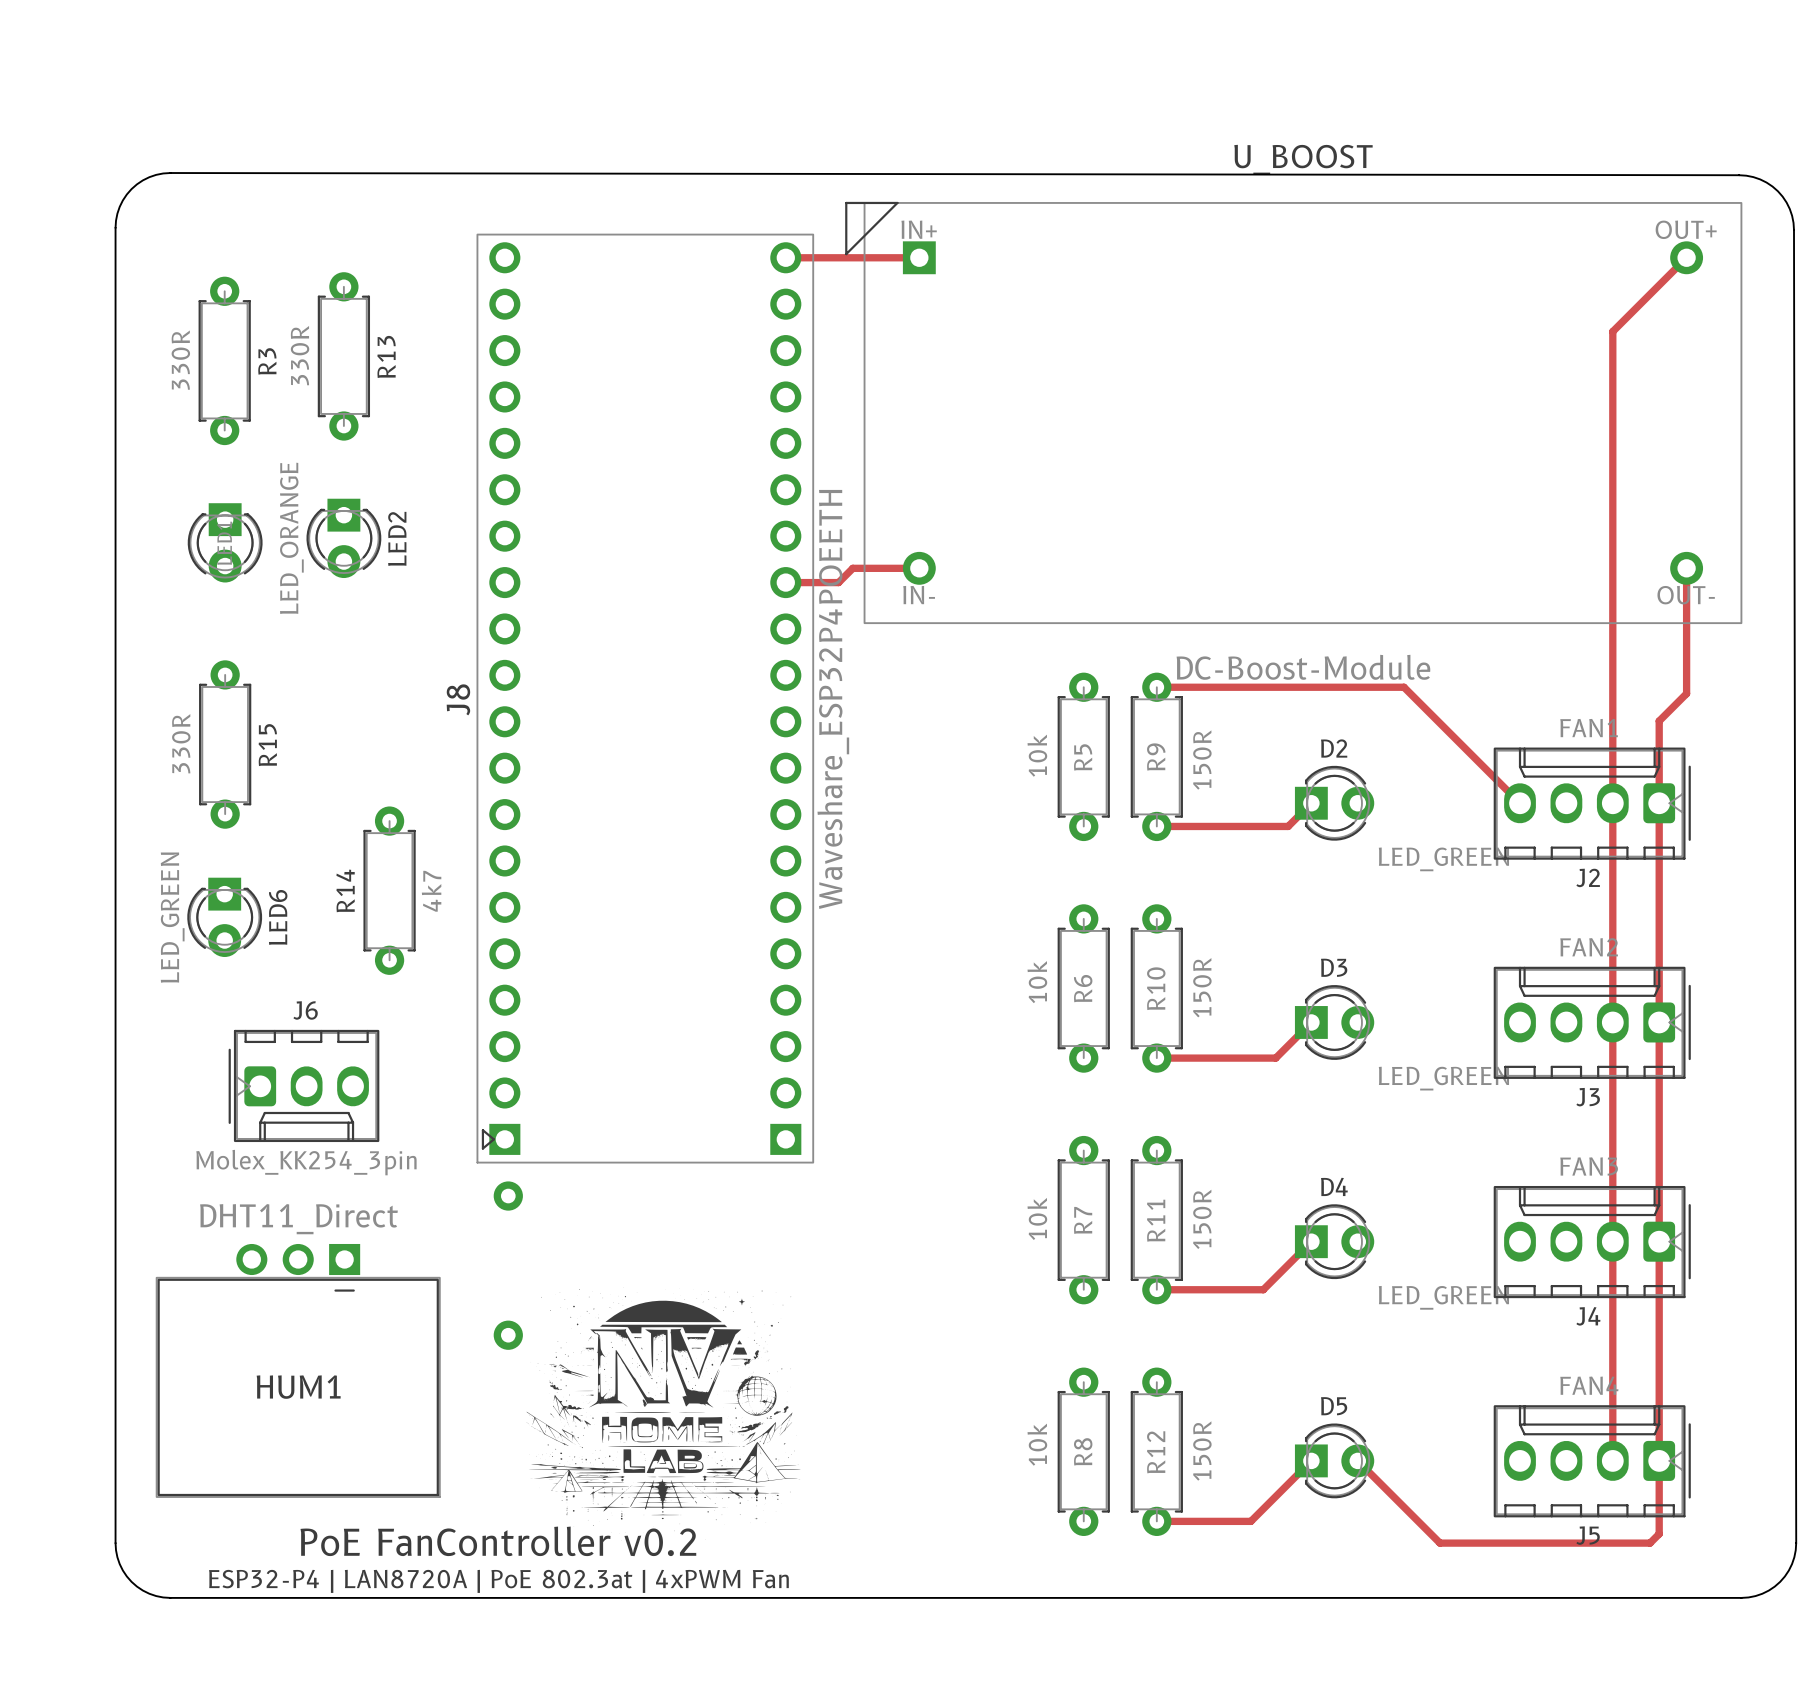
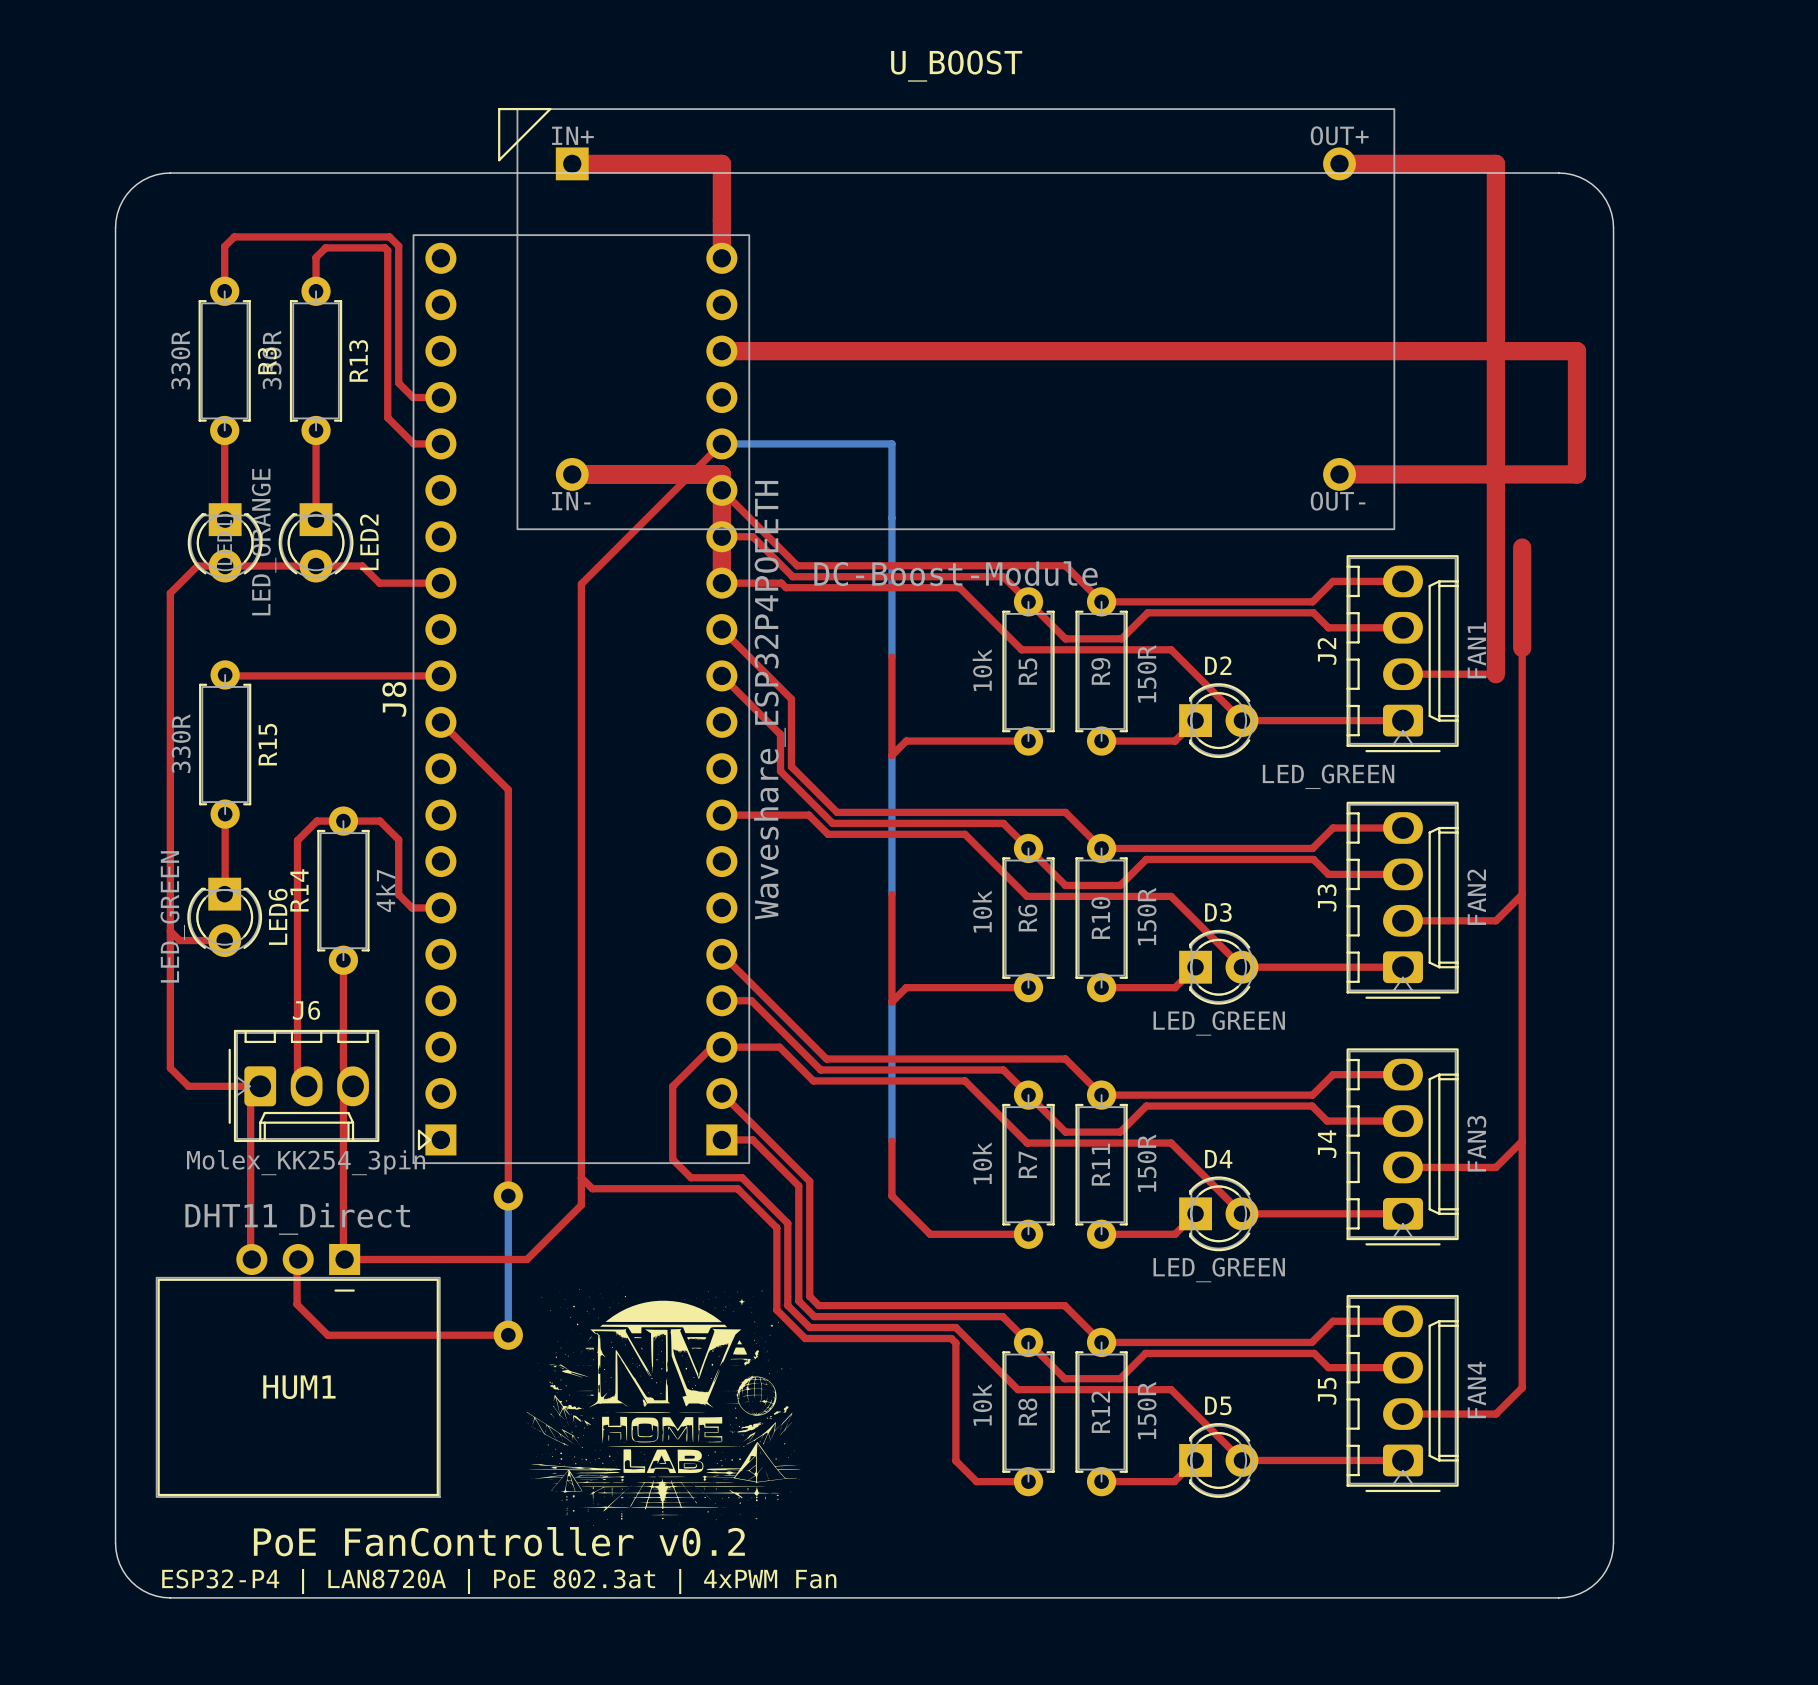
top track: none -> (572, 163) (721, 163) (721, 258)
top track: none -> (1339, 163) (1495, 163) (1495, 674) (1402, 674)
board edge: (170, 173) (1739, 175) (1760, 179) (1777, 191) (1789, 209) (1794, 230) (1795, 1550) (1792, 1564) (1784, 1576) (1774, 1586) (1755, 1596) (1741, 1597) (1558, 1597) -> (170, 173) (1558, 173) (1579, 177) (1597, 189) (1609, 206) (1613, 227) (1613, 1543) (1609, 1564) (1597, 1581) (1579, 1593) (1558, 1597)
top track: (785, 257) (919, 257) -> none
top track: (1686, 257) (1612, 331) (1612, 1460) -> none
top track: none -> (224, 291) (224, 246) (234, 236) (389, 236) (398, 246) (398, 383) (413, 397) (440, 397)
top track: none -> (316, 291) (316, 257) (325, 247) (385, 247) (387, 250) (387, 417) (413, 443) (440, 443)
top track: none -> (721, 351) (1577, 351) (1577, 474) (1339, 474)
R13 position: (343, 356) -> (316, 360)
U_BOOST position: (1293, 412) -> (946, 319)
top track: none -> (224, 430) (224, 519)
top track: none -> (316, 430) (316, 519)
top track: none -> (721, 443) (581, 584) (581, 1205) (527, 1259) (343, 1259) (343, 1086)
bottom track: none -> (721, 443) (891, 443) (891, 657)
top track: none -> (572, 474) (721, 474) (721, 583) (781, 583) (785, 587) (959, 587) (1021, 649) (1171, 649) (1241, 720) (1402, 720)
top track: none -> (721, 490) (797, 565) (1065, 565) (1101, 601) (1312, 601) (1333, 581) (1402, 581)
top track: none -> (721, 536) (752, 536) (792, 576) (1003, 576) (1065, 638) (1121, 638) (1147, 612) (1313, 612) (1328, 627) (1402, 627)
LED2 position: (343, 538) -> (316, 542)
top track: none -> (1522, 547) (1522, 1387) (1495, 1414) (1402, 1414)
top track: (919, 568) (852, 568) (838, 582) (785, 582) -> none
top track: (1686, 568) (1686, 693) (1659, 721) (1659, 1533) (1650, 1543) (1439, 1543) (1357, 1460) -> none
top track: none -> (440, 583) (379, 583) (362, 566) (197, 566) (170, 593) (170, 1068) (188, 1086) (251, 1086)
top track: none -> (721, 629) (791, 699) (791, 766) (837, 812) (1065, 812) (1101, 848) (1312, 848) (1333, 828) (1402, 828)
top track: none -> (891, 657) (891, 755) (906, 741) (1028, 741)
top track: none -> (226, 675) (440, 675)
top track: none -> (721, 675) (780, 734) (780, 771) (832, 823) (1003, 823) (1065, 885) (1120, 885) (1146, 859) (1313, 859) (1328, 874) (1402, 874)
top track: (1156, 687) (1404, 687) (1520, 803) -> none
J8 position: (645, 698) -> (581, 699)
top track: none -> (1195, 720) (1175, 741) (1101, 741)
top track: none -> (440, 722) (508, 789) (508, 1196)
bottom track: none -> (891, 755) (891, 894)
R5 position: (1083, 756) -> (1028, 671)
R9 position: (1156, 756) -> (1101, 671)
top track: (1311, 803) (1288, 826) (1156, 826) -> none
D2 position: (1334, 803) -> (1218, 720)
J2 rotation: 0° (1592, 803) -> 90° clockwise (1402, 653)
J2 position: (1592, 803) -> (1402, 653)
top track: none -> (225, 814) (225, 893)
top track: none -> (721, 815) (808, 815) (828, 834) (965, 834) (1027, 896) (1171, 896) (1241, 967) (1402, 967)
R14 position: (389, 890) -> (343, 890)
top track: none -> (891, 894) (891, 1002) (906, 987) (1028, 987)
top track: none -> (1522, 894) (1495, 920) (1402, 920)
top track: none -> (440, 907) (412, 907) (398, 894) (398, 839) (379, 821) (316, 821) (297, 840) (297, 1086)
top track: none -> (170, 931) (179, 940) (224, 940)
top track: none -> (721, 954) (826, 1059) (1065, 1059) (1101, 1095) (1312, 1095) (1333, 1074) (1402, 1074)
top track: none -> (343, 960) (343, 1086)
top track: none -> (1195, 967) (1175, 987) (1101, 987)
R6 position: (1083, 988) -> (1028, 918)
R10 position: (1156, 988) -> (1101, 918)
top track: none -> (721, 1000) (751, 1000) (820, 1069) (1003, 1069) (1065, 1132) (1120, 1132) (1146, 1106) (1312, 1106) (1327, 1121) (1402, 1121)
bottom track: none -> (891, 1002) (891, 1141)
top track: (1311, 1022) (1275, 1058) (1156, 1058) -> none
D3 position: (1334, 1022) -> (1218, 967)
J3 rotation: 0° (1592, 1022) -> 90° clockwise (1402, 900)
J3 position: (1592, 1022) -> (1402, 900)
top track: none -> (712, 1047) (672, 1086) (672, 1159) (690, 1177) (742, 1177) (787, 1223) (787, 1305) (809, 1327) (955, 1327) (1017, 1389) (1171, 1389) (1241, 1460) (1402, 1460)
top track: none -> (721, 1047) (779, 1047) (813, 1080) (965, 1080) (1027, 1143) (1171, 1143) (1241, 1213) (1402, 1213)
D3 value position: LED_GREEN (1443, 1078) -> LED_GREEN (1219, 1023)
top track: none -> (250, 1086) (250, 1259)
top track: none -> (721, 1093) (809, 1181) (809, 1296) (818, 1305) (1064, 1305) (1101, 1342) (1311, 1342) (1333, 1321) (1402, 1321)
top track: none -> (721, 1139) (752, 1139) (798, 1185) (798, 1301) (814, 1316) (1002, 1316) (1064, 1378) (1120, 1378) (1145, 1353) (1314, 1353) (1328, 1367) (1402, 1367)
top track: none -> (891, 1141) (891, 1196) (930, 1234) (1028, 1234)
top track: none -> (1522, 1141) (1495, 1167) (1402, 1167)
top track: none -> (581, 1177) (592, 1188) (737, 1188) (776, 1227) (776, 1310) (805, 1338) (951, 1338) (955, 1343) (955, 1460) (976, 1481) (1028, 1481)
bottom track: none -> (508, 1196) (508, 1335)
top track: none -> (1195, 1213) (1175, 1234) (1101, 1234)
R7 position: (1083, 1220) -> (1028, 1164)
R11 position: (1156, 1220) -> (1101, 1164)
top track: (1311, 1241) (1263, 1289) (1156, 1289) -> none
D4 position: (1334, 1241) -> (1218, 1213)
J4 rotation: 0° (1592, 1242) -> 90° clockwise (1402, 1146)
J4 position: (1592, 1242) -> (1402, 1146)
top track: none -> (297, 1259) (297, 1304) (327, 1335) (508, 1335)
D4 value position: LED_GREEN (1443, 1297) -> LED_GREEN (1219, 1270)
R8 position: (1083, 1451) -> (1028, 1412)
R12 position: (1156, 1451) -> (1101, 1412)
top track: none -> (1195, 1460) (1174, 1481) (1101, 1481)
top track: (1311, 1460) (1250, 1521) (1156, 1521) -> none
D5 position: (1334, 1460) -> (1218, 1460)
J5 rotation: 0° (1592, 1461) -> 90° clockwise (1402, 1393)
J5 position: (1592, 1461) -> (1402, 1393)

